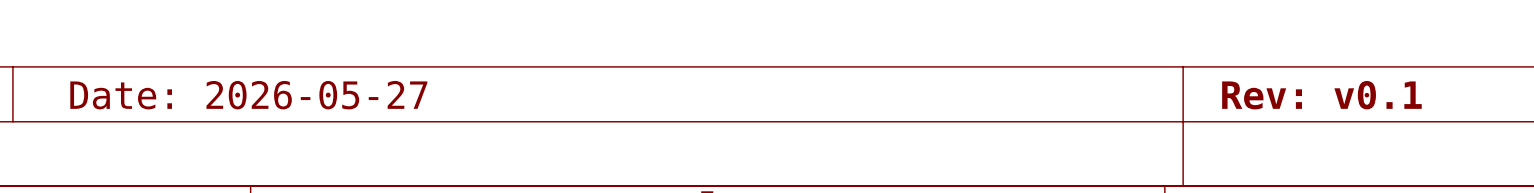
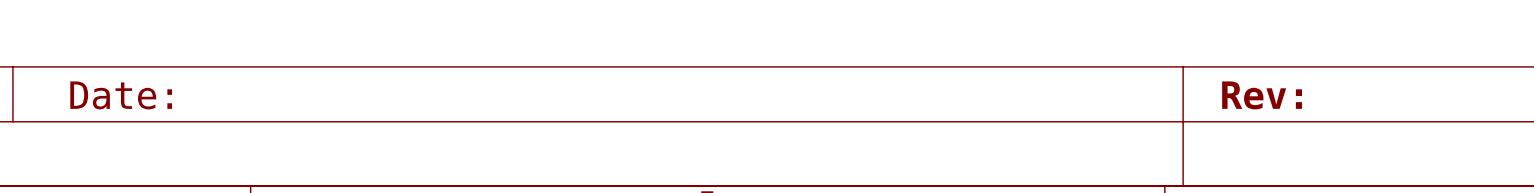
title block: Date: 2026-05-27 (248, 95) -> Date: (121, 95)
title block: Rev: v0.1 (1321, 95) -> Rev: (1262, 95)

